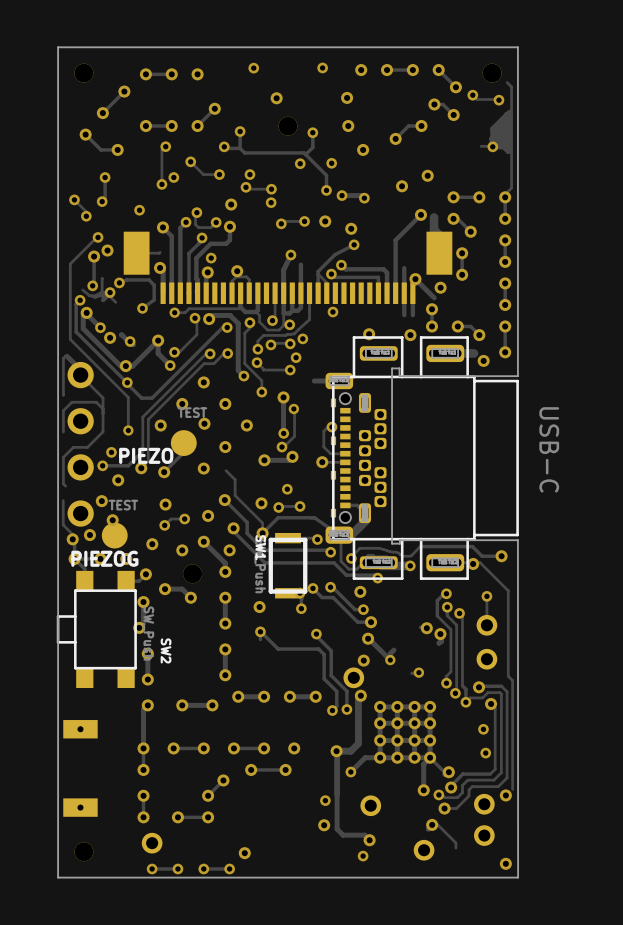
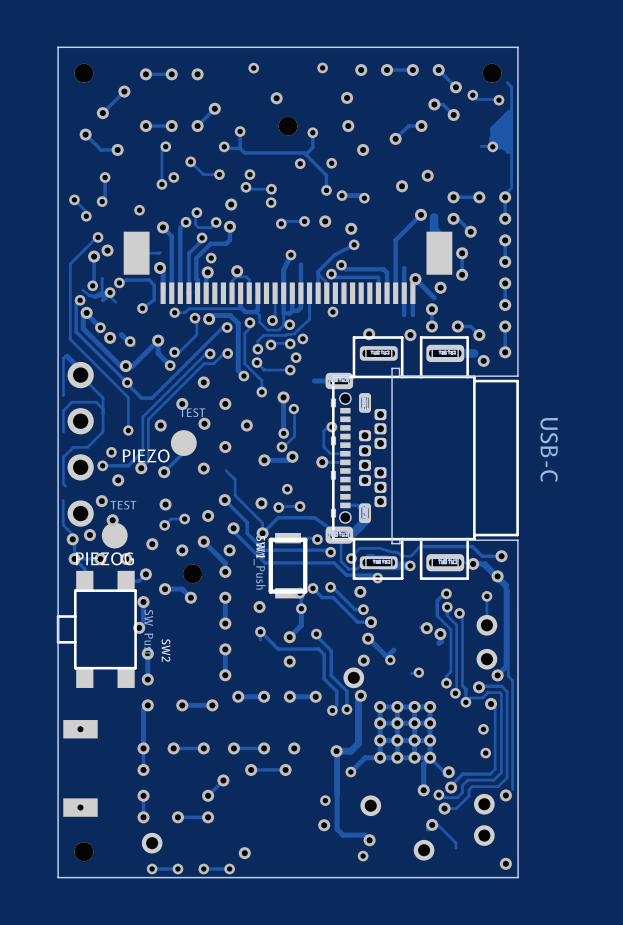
track: none -> (473, 563) (485, 563) (506, 584) (506, 666) (497, 675)
via: none -> (497, 576)
track: none -> (301, 608) (301, 625) (289, 637)
via: none -> (289, 637)
via: none -> (289, 661)
via: none -> (497, 675)

